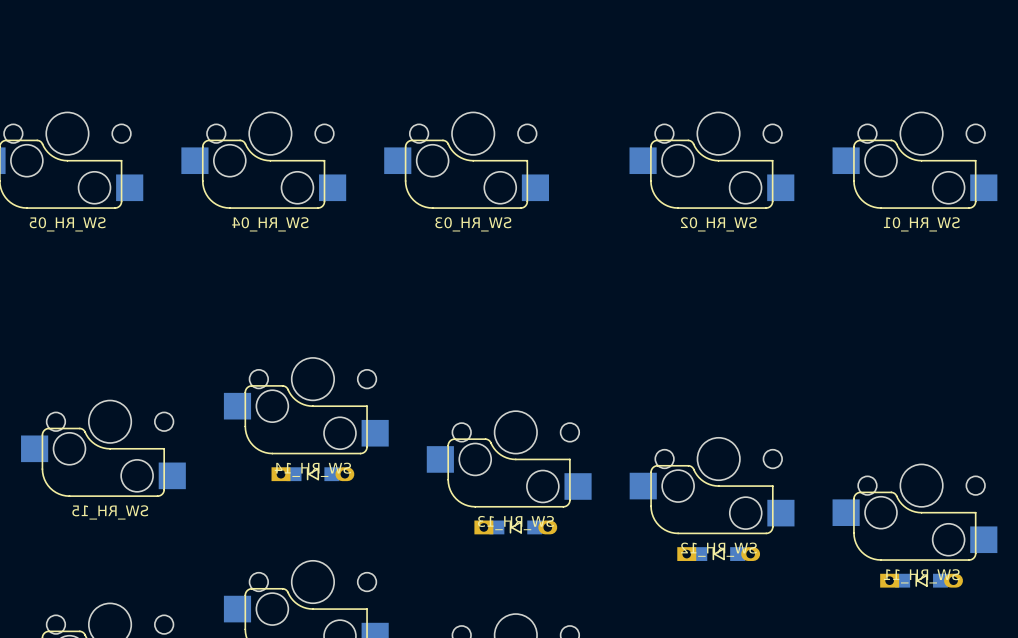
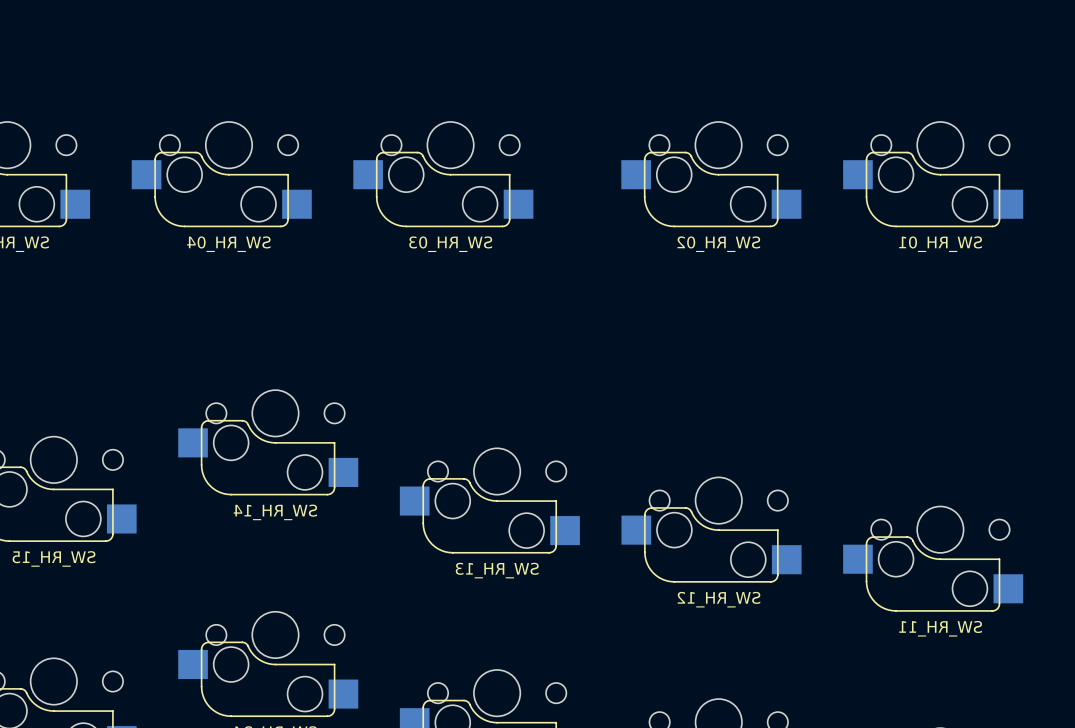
part: (312, 474) -> none
part: (515, 527) -> none
part: (718, 554) -> none
part: (921, 580) -> none

